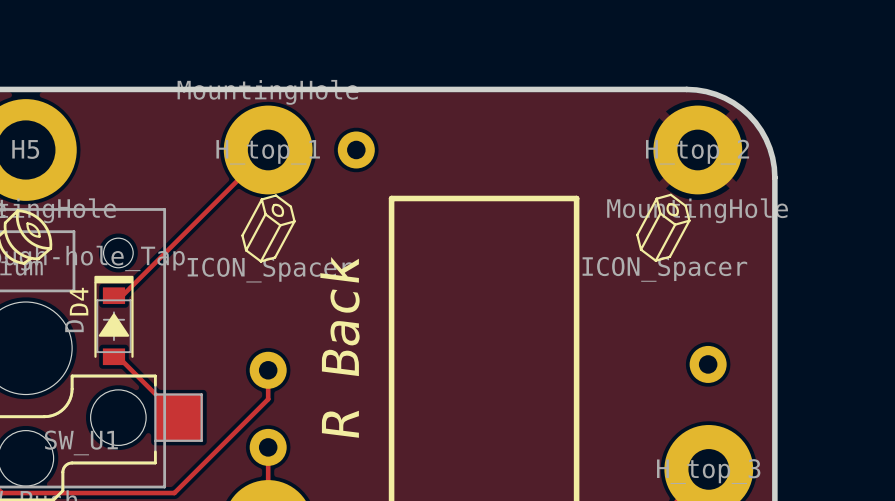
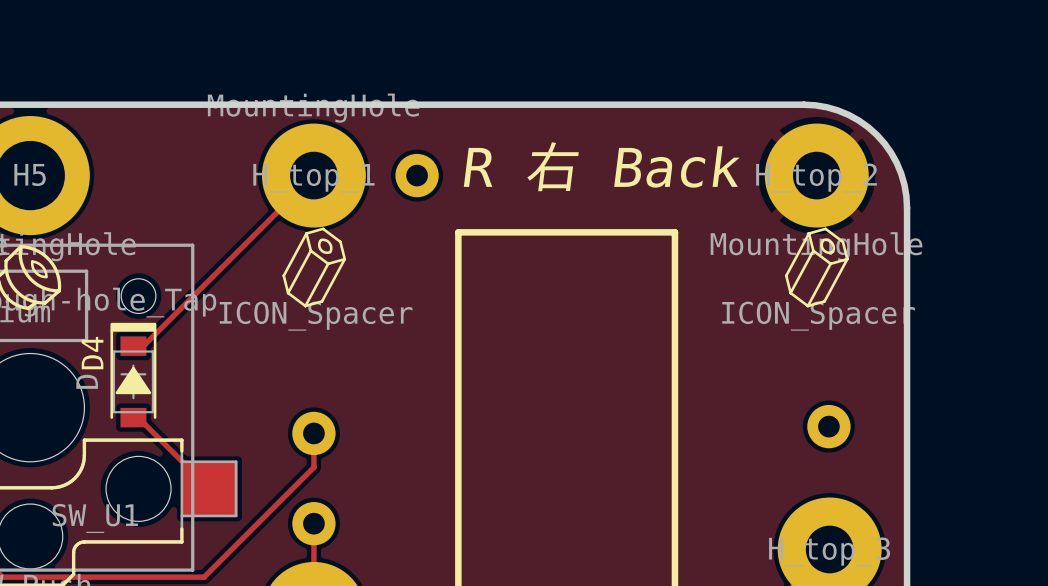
text: none -> R 右 Back (601, 166)
drawing position: (663, 227) -> (816, 267)
text: R Back (339, 347) -> none

